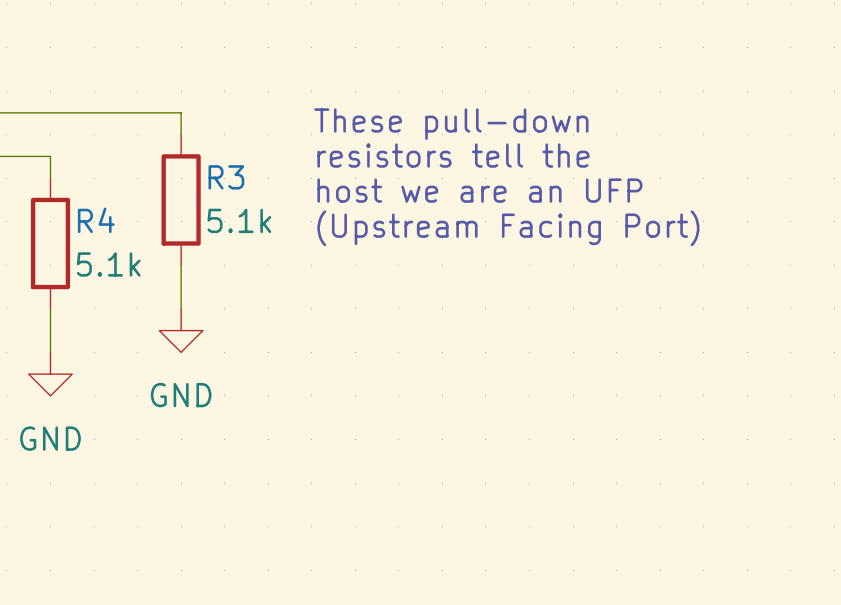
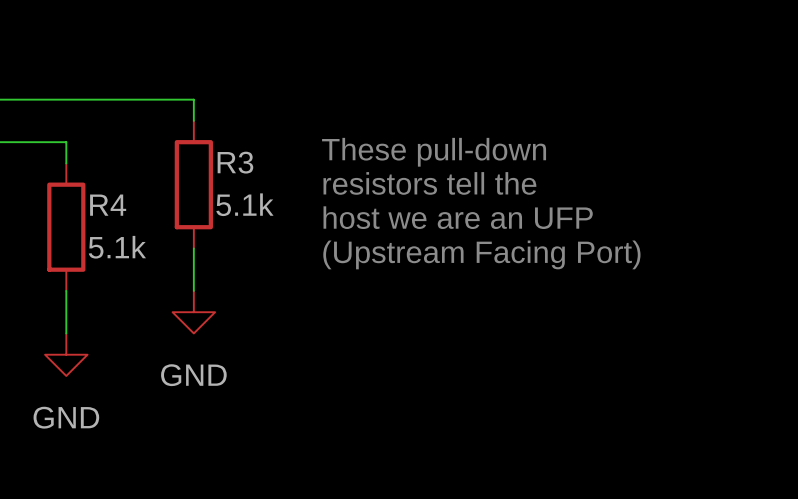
text: These pull-down (451, 124) -> none
text: resistors tell the (453, 155) -> These pull-down (434, 152)
text: host we are an UFP (479, 190) -> resistors tell the (429, 183)
text: (Upstream Facing Port) (508, 228) -> host we are an UFP (458, 217)
text: none -> (Upstream Facing Port) (481, 254)

